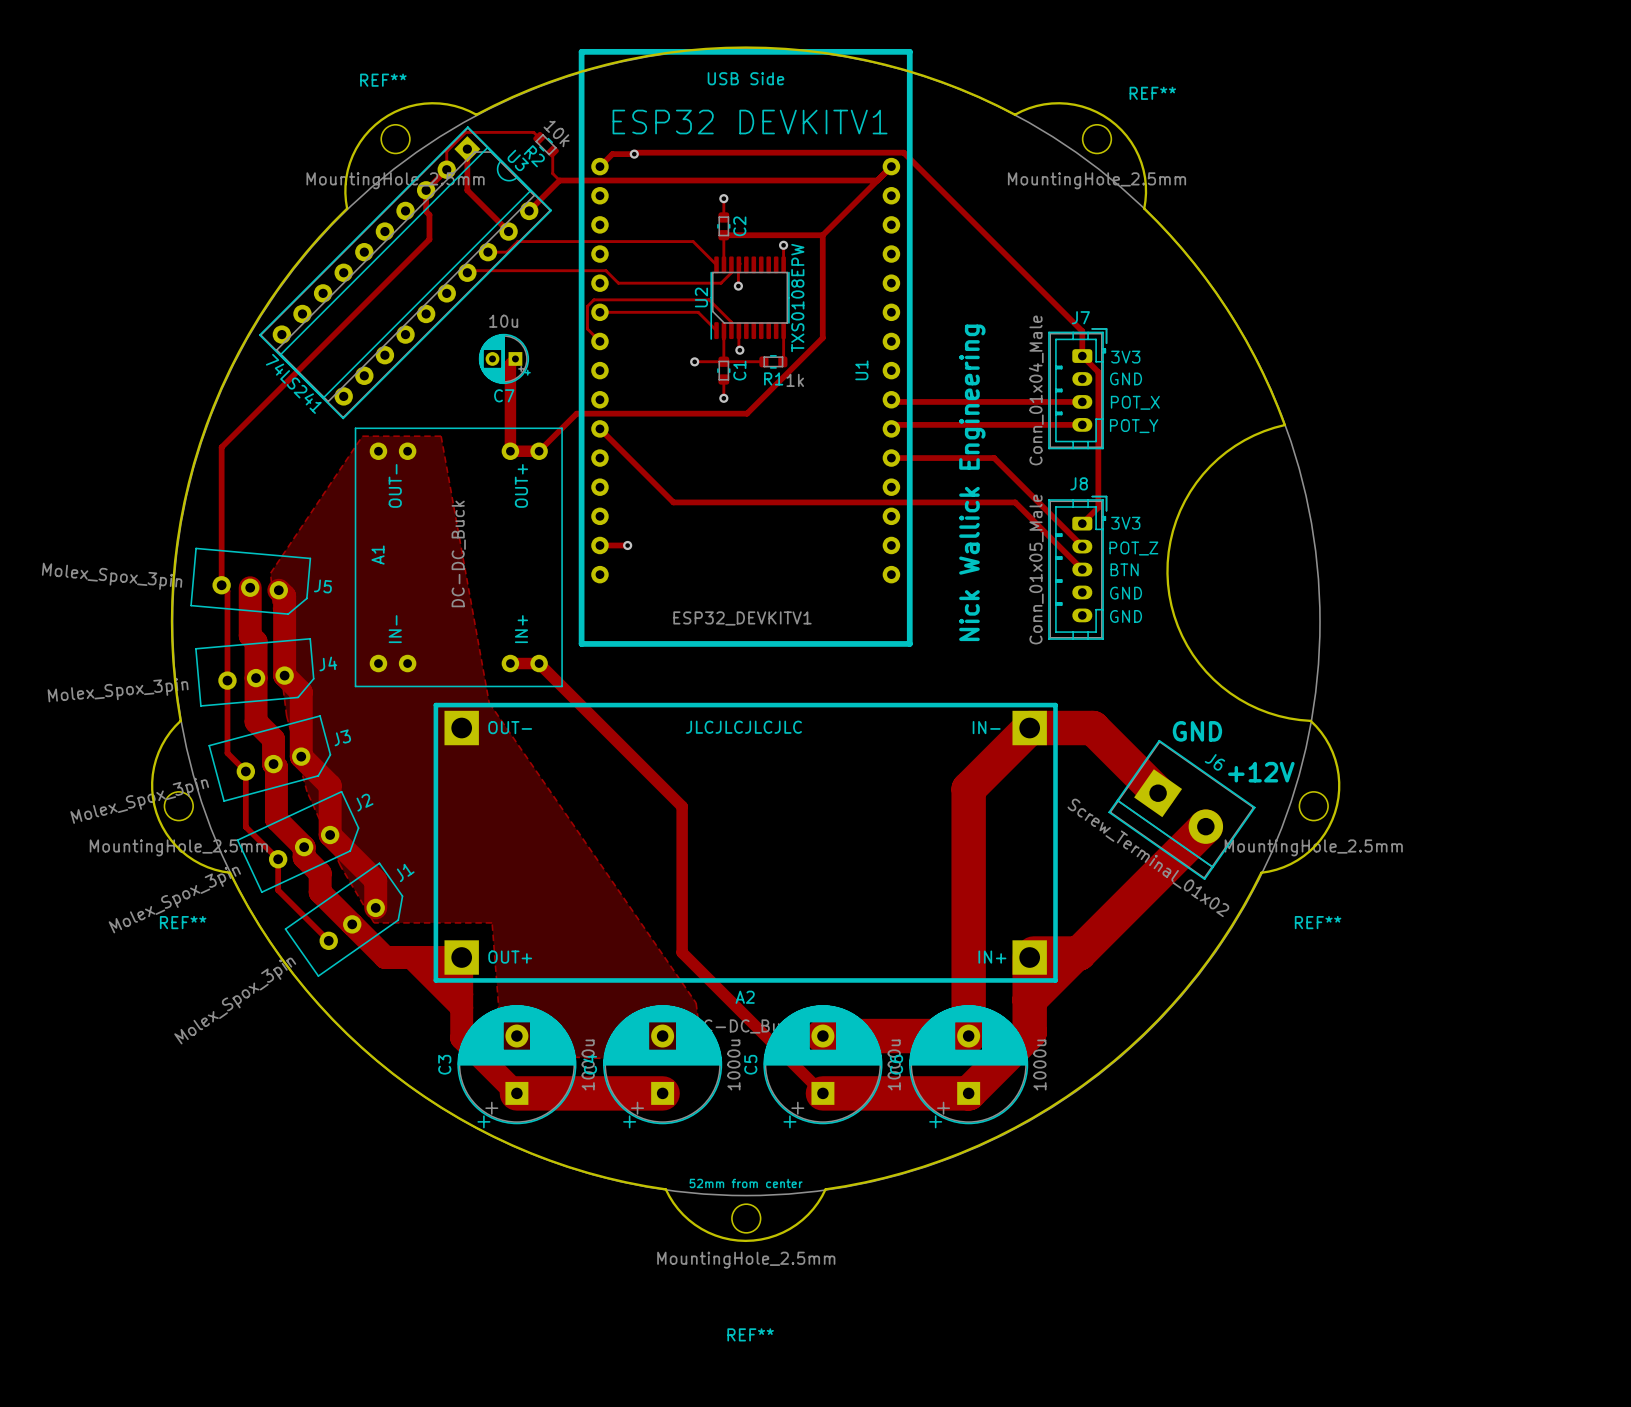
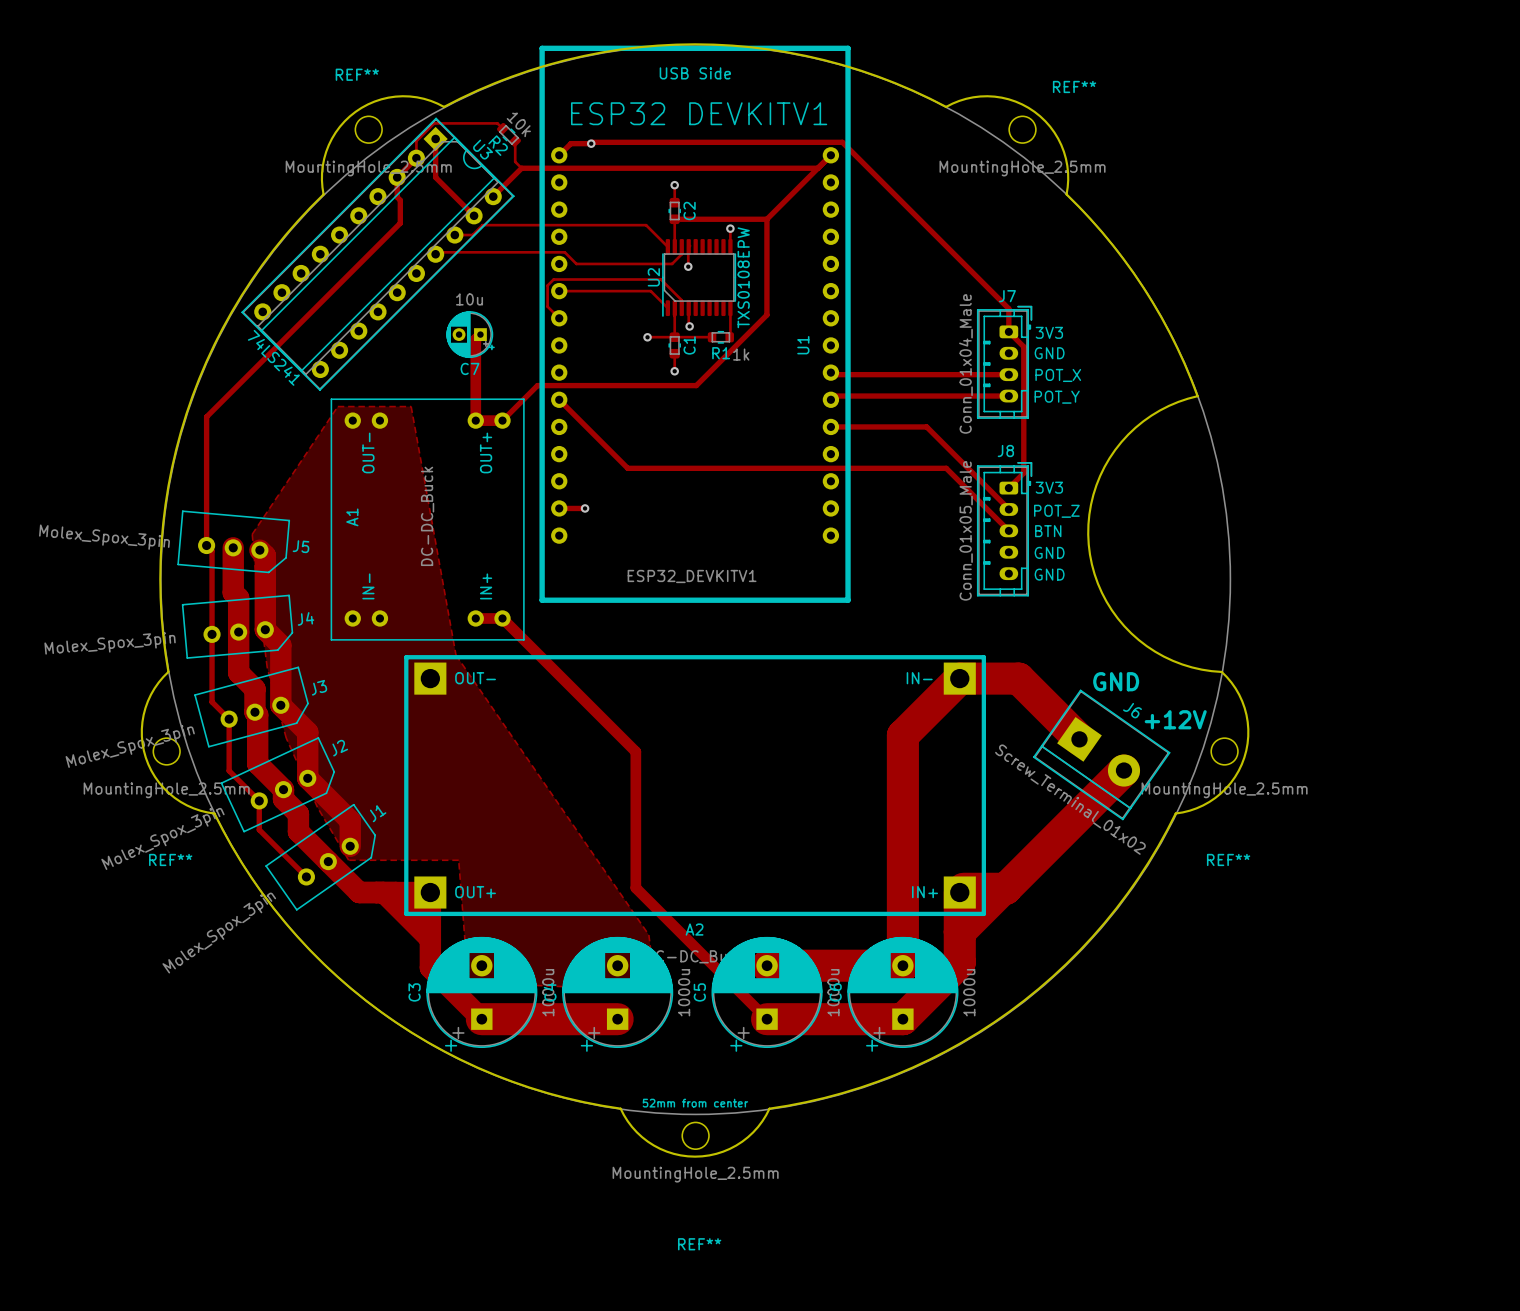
text: Nick Wallick Engineering (972, 482) -> none
text: JLCJLCJLCJLC (743, 727) -> none

